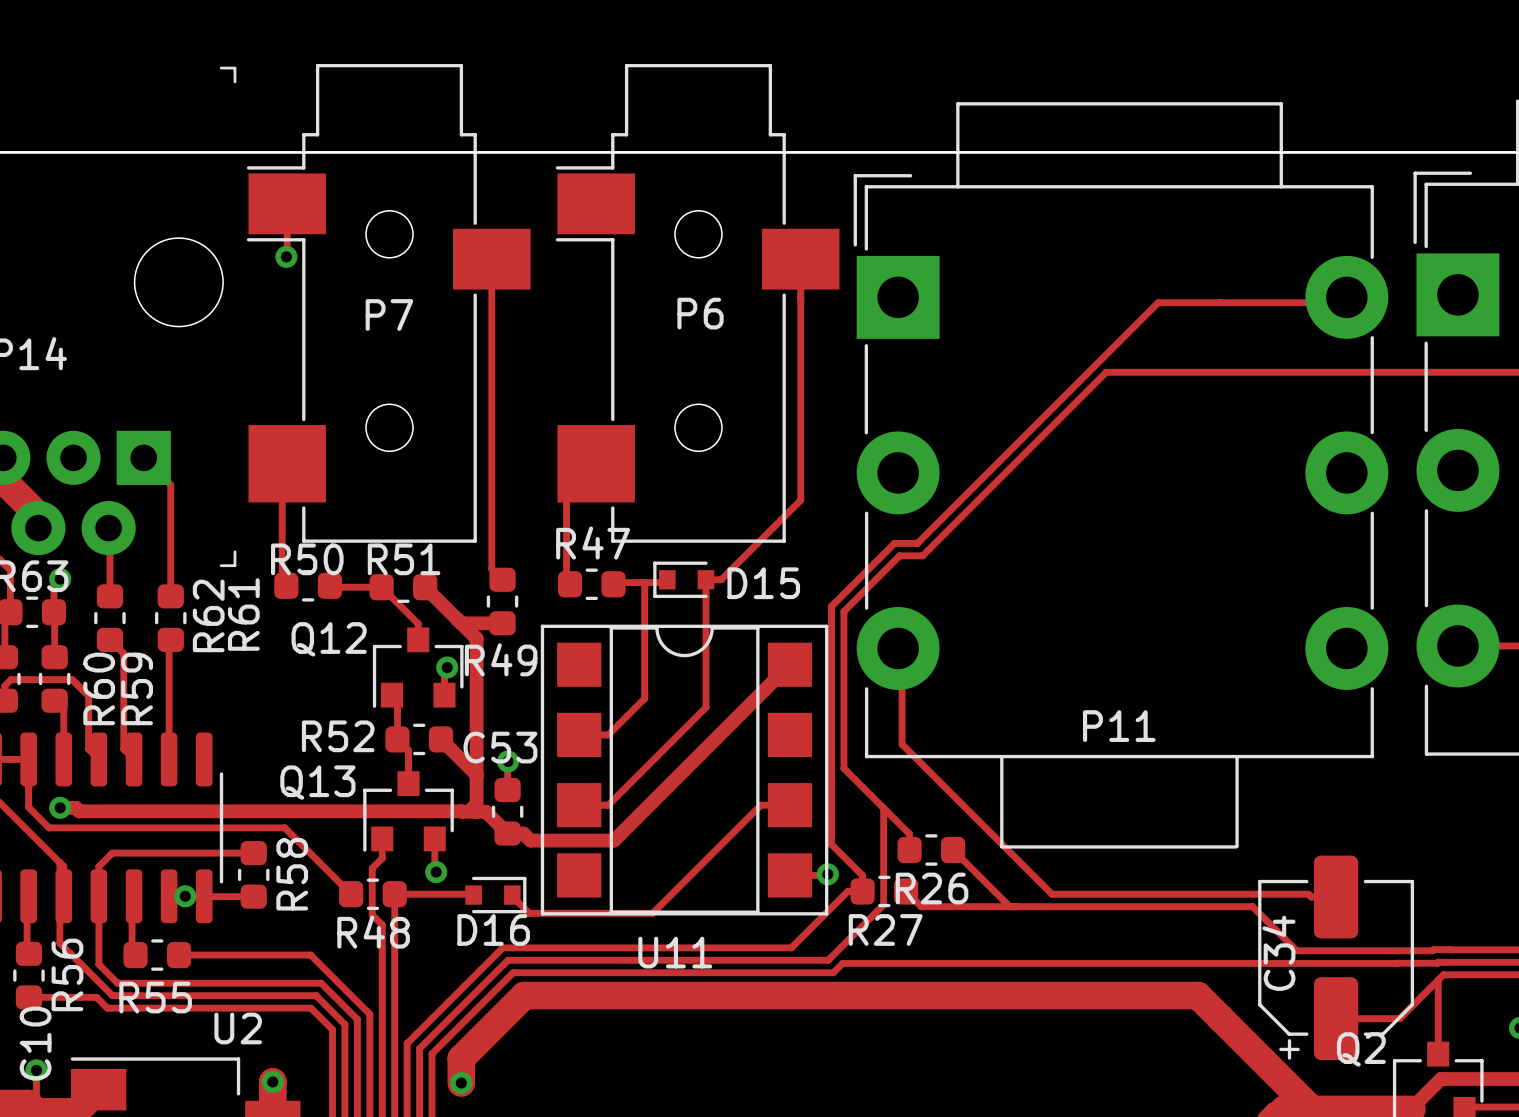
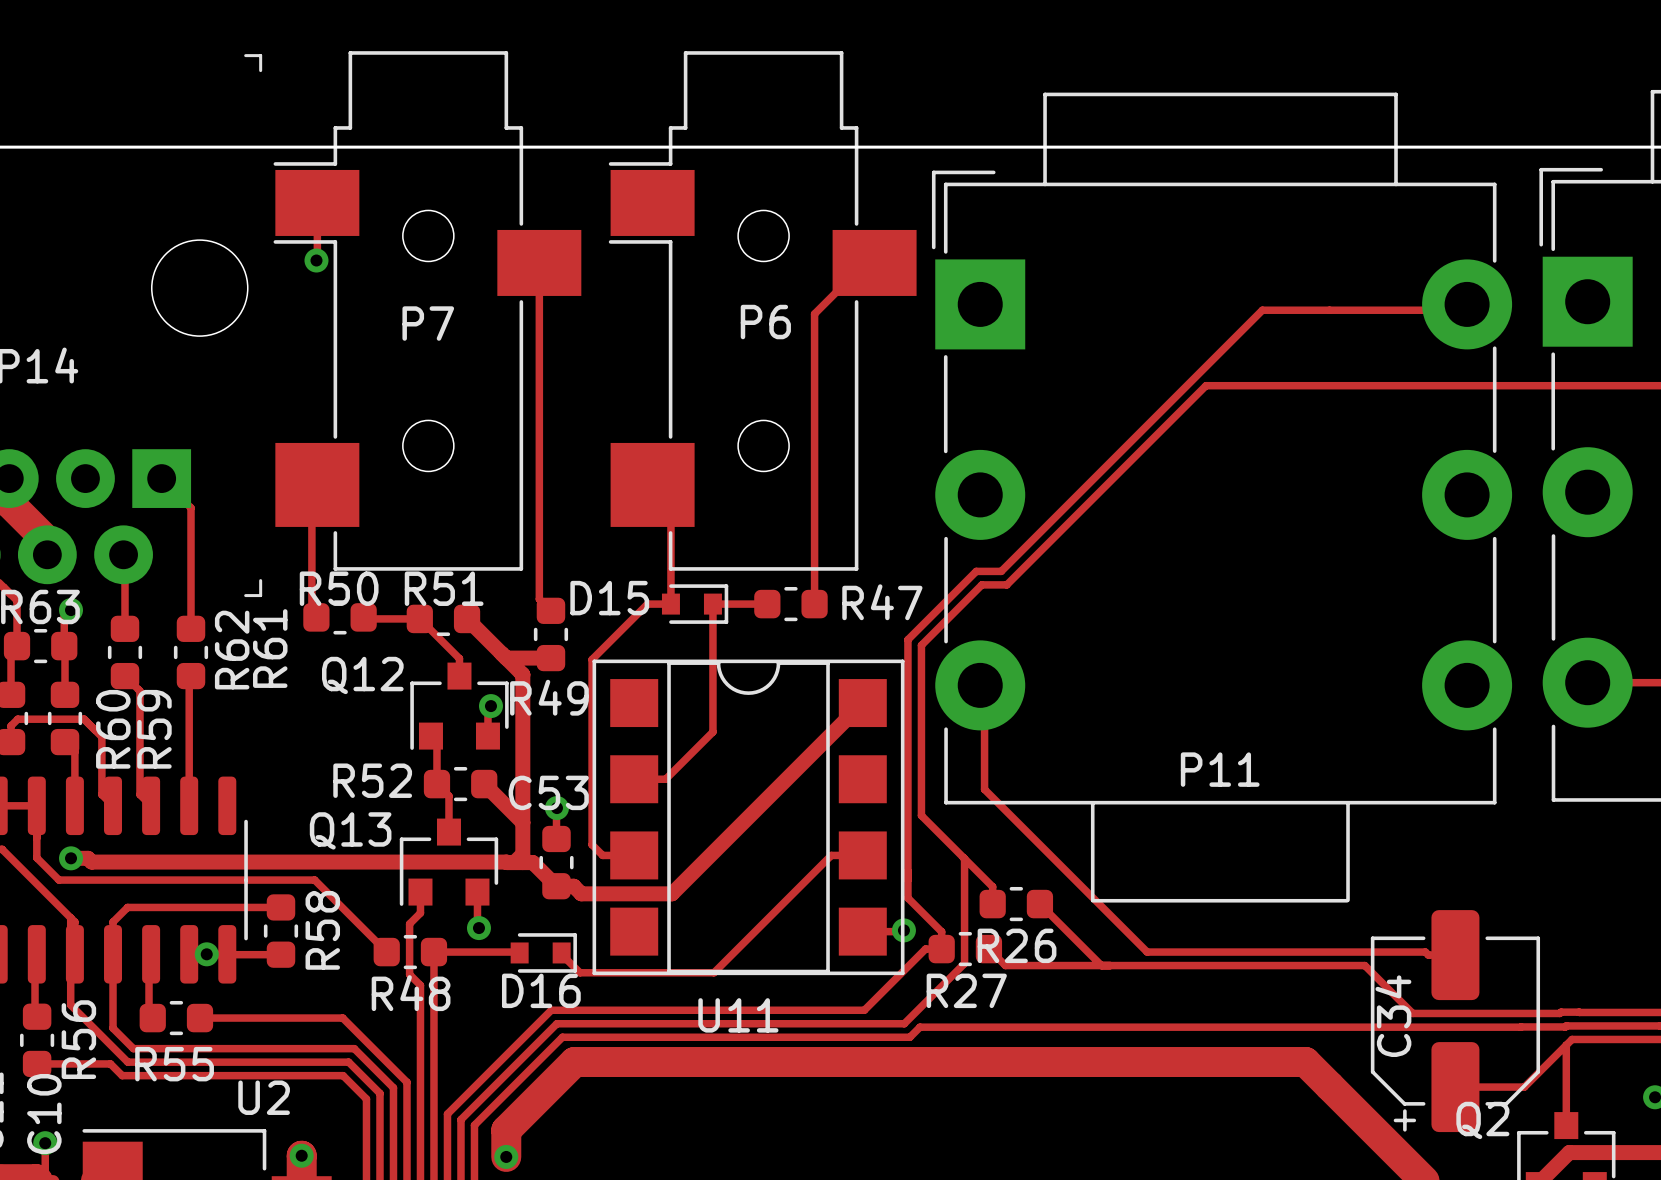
track: (800, 259) (800, 500) (721, 579) (706, 579) (706, 707) (608, 805) (579, 805) -> (874, 262) (865, 262) (814, 313) (814, 604)
track: (596, 463) (566, 493) (566, 582) -> (652, 484) (670, 503) (670, 604) (647, 604) (592, 659) (592, 844) (602, 855) (634, 855)
R47 name position: R47 (593, 543) -> R47 (882, 602)
track: (667, 579) (664, 582) (618, 582) -> none
D15 rotation: 0° (683, 579) -> 180° (695, 604)
D15 position: (683, 579) -> (695, 604)
track: (644, 582) (644, 698) -> (767, 604) (712, 604) (712, 731) (705, 739)
R47 position: (591, 584) -> (790, 604)

